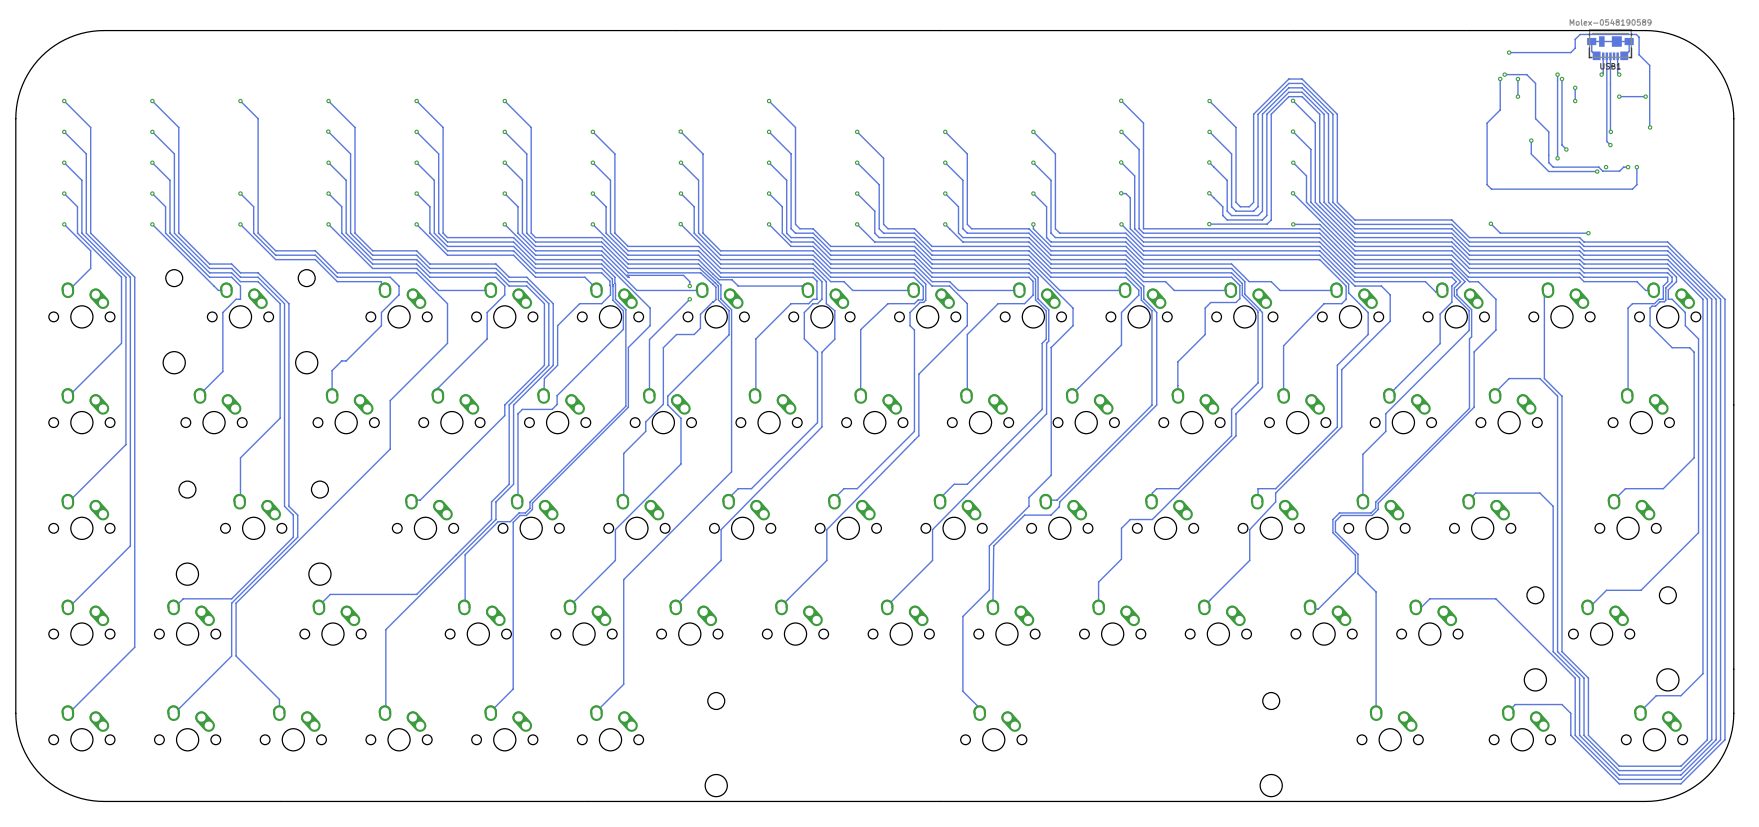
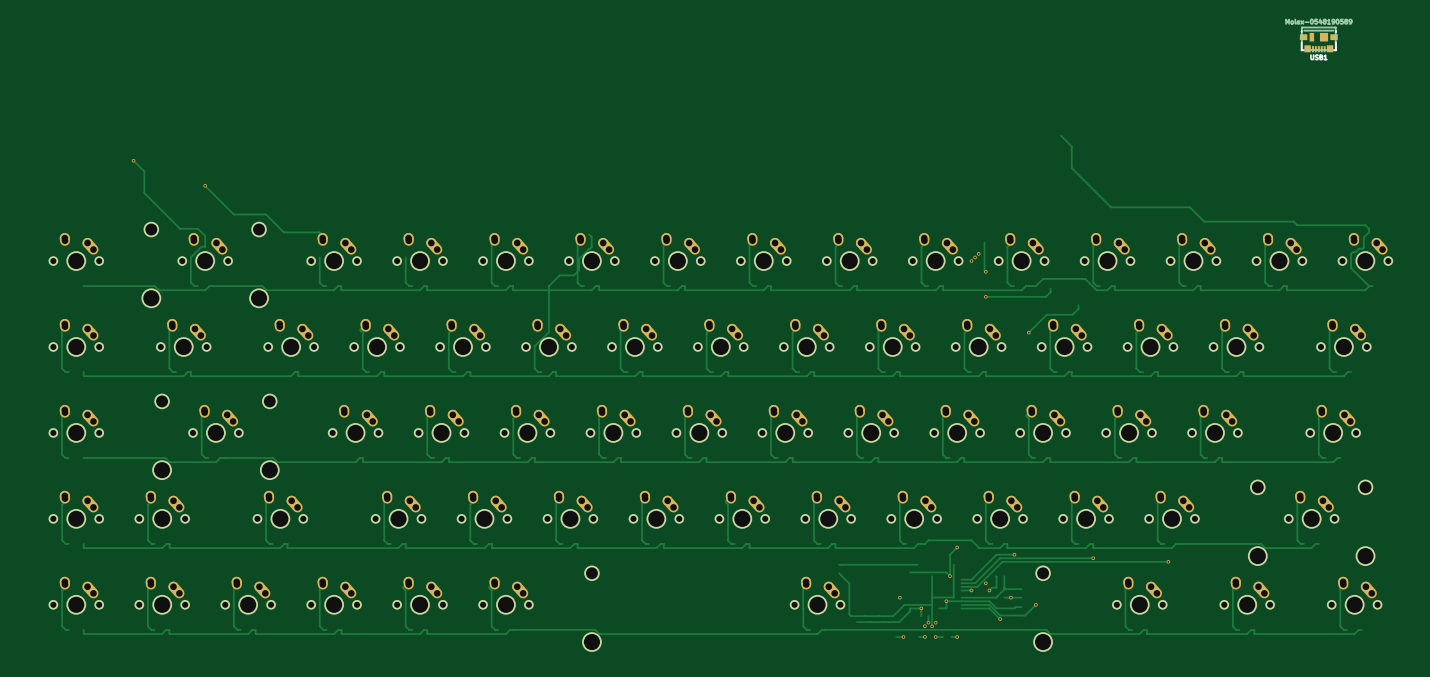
board edge: (1645, 30) (103, 30) (86, 32) (70, 37) (50, 48) (30, 69) (20, 90) (16, 112) (15, 713) (17, 730) (22, 747) (37, 771) (54, 786) (75, 796) (103, 801) (1645, 801) (1662, 799) (1679, 794) (1699, 783) (1718, 762) (1729, 741) (1733, 719) (1733, 112) (1730, 95) (1724, 79) (1707, 56) (1694, 45) (1679, 37) (1662, 32) (1645, 30) -> none
track: (1509, 52) (1570, 52) (1575, 48) (1575, 39) (1580, 34) (1636, 34) (1639, 37) (1639, 54) (1649, 65) (1650, 127) -> none
via: (1509, 52) -> none
track: (1624, 55) (1629, 51) (1629, 41) (1591, 41) (1591, 51) (1596, 55) -> none
track: (1603, 56) (1601, 74) -> none
track: (1606, 56) (1606, 141) (1610, 145) -> none
track: (1610, 56) (1610, 131) -> none
track: (1617, 56) (1619, 74) -> none
track: (1504, 74) (1526, 74) (1535, 83) (1535, 118) (1548, 131) (1548, 162) (1553, 167) (1598, 167) (1602, 171) (1619, 171) (1623, 167) (1628, 167) -> none
via: (1504, 74) -> none
track: (1557, 74) (1557, 158) -> none
via: (1557, 74) -> none
via: (1601, 74) -> none
via: (1619, 74) -> none
track: (1500, 78) (1500, 109) (1487, 123) (1487, 184) (1491, 189) (1632, 189) (1636, 184) (1636, 167) -> none
via: (1500, 78) -> none
track: (1517, 79) (1517, 96) -> none
via: (1517, 79) -> none
track: (1561, 79) (1561, 145) (1566, 149) -> none
via: (1561, 79) -> none
track: (1575, 87) (1575, 101) -> none
via: (1575, 87) -> none
via: (1517, 96) -> none
via: (1619, 96) -> none
track: (1645, 96) (1619, 96) -> none
via: (1645, 96) -> none
track: (1121, 100) (1143, 123) (1143, 228) (1319, 228) (1354, 264) (1451, 264) (1469, 281) (1478, 281) (1495, 299) (1495, 330) (1474, 351) (1474, 407) (1378, 503) (1378, 509) (1372, 515) (1341, 515) (1335, 521) (1335, 531) (1357, 554) (1357, 573) (1376, 591) (1376, 714) -> (1132, 629) (1125, 626) (1125, 587) (1128, 584)
via: (1121, 100) -> none
track: (1293, 100) (1315, 123) (1315, 202) (1354, 242) (1451, 242) (1469, 259) (1579, 259) (1584, 264) (1667, 264) (1702, 299) (1702, 673) (1680, 695) (1656, 695) (1640, 711) (1640, 714) -> none
via: (1293, 100) -> none
track: (64, 101) (90, 127) (90, 233) (134, 277) (134, 647) (68, 714) -> (68, 629) (62, 626) (62, 590) (65, 584)
via: (64, 101) -> none
track: (152, 101) (178, 127) (178, 233) (209, 264) (231, 264) (240, 272) (258, 272) (288, 303) (288, 506) (297, 515) (297, 537) (231, 603) (231, 656) (173, 714) -> (154, 629) (147, 626) (147, 587) (150, 584)
via: (152, 101) -> none
track: (240, 101) (258, 118) (258, 233) (275, 250) (315, 250) (337, 272) (416, 272) (447, 303) (447, 343) (390, 400) (390, 449) (236, 603) (236, 656) (279, 699) (279, 714) -> (240, 629) (237, 629) (233, 626) (233, 587) (236, 584)
via: (240, 101) -> none
track: (328, 101) (355, 127) (355, 233) (372, 250) (416, 250) (429, 264) (495, 264) (509, 277) (526, 277) (553, 303) (553, 365) (513, 404) (513, 484) (495, 501) (495, 519) (385, 629) (385, 714) -> (326, 629) (323, 629) (319, 626) (319, 587) (322, 584)
via: (328, 101) -> none
track: (416, 101) (443, 127) (443, 233) (447, 237) (513, 237) (535, 259) (601, 259) (650, 308) (650, 325) (628, 347) (628, 407) (532, 503) (532, 509) (526, 515) (520, 515) (513, 522) (513, 689) (490, 711) -> (412, 629) (405, 626) (405, 590) (403, 586) (408, 581)
via: (416, 101) -> none
track: (504, 101) (531, 127) (531, 233) (535, 237) (601, 237) (628, 264) (698, 264) (717, 281) -> none
via: (504, 101) -> none
track: (769, 101) (795, 127) (795, 224) (799, 228) (813, 228) (830, 246) (914, 246) (932, 264) (1028, 264) (1073, 308) (1073, 325) (1051, 347) (1051, 475) (1028, 497) (1028, 506) (989, 545) (989, 590) (962, 616) (962, 691) (979, 708) (979, 714) -> (810, 629) (803, 626) (803, 587) (806, 584)
via: (769, 101) -> none
track: (1209, 101) (1236, 127) (1236, 202) (1240, 206) (1249, 206) (1253, 202) (1253, 114) (1288, 79) (1302, 79) (1337, 114) (1337, 202) (1354, 219) (1451, 219) (1469, 237) (1579, 237) (1584, 242) (1667, 242) (1724, 299) (1724, 739) (1680, 783) (1619, 783) (1570, 735) (1570, 713) (1561, 704) (1515, 704) (1508, 711) -> none
via: (1209, 101) -> none
via: (1575, 101) -> none
via: (1650, 127) -> none
track: (64, 131) (86, 153) (86, 233) (130, 277) (130, 545) (68, 609) -> (68, 543) (62, 540) (62, 504) (65, 498)
via: (64, 131) -> none
track: (152, 131) (174, 153) (174, 233) (209, 268) (231, 268) (240, 277) (258, 277) (284, 303) (284, 506) (293, 515) (293, 537) (231, 598) (183, 598) (176, 605) (173, 605) -> none
via: (152, 131) -> none
track: (328, 131) (350, 153) (350, 233) (372, 255) (416, 255) (429, 268) (495, 268) (509, 281) (526, 281) (548, 303) (548, 365) (509, 404) (509, 484) (491, 501) (491, 519) (416, 594) (330, 594) (318, 605) -> none
via: (328, 131) -> none
track: (416, 131) (438, 153) (438, 233) (447, 242) (513, 242) (535, 264) (601, 264) (614, 277) (615, 299) (625, 309) (625, 406) (529, 502) (529, 508) (525, 512) (519, 512) (510, 521) (498, 521) (465, 554) (464, 605) -> none
via: (416, 131) -> none
track: (504, 131) (526, 153) (526, 233) (535, 242) (601, 242) (628, 268) (699, 268) (715, 282) -> none
via: (504, 131) -> none
track: (592, 131) (614, 153) (614, 233) (628, 246) (698, 246) (720, 268) (813, 268) (826, 281) (826, 303) (834, 310) (834, 339) (821, 352) (821, 427) (721, 529) (721, 560) (675, 605) -> none
via: (592, 131) -> none
track: (680, 131) (703, 153) (703, 233) (720, 250) (813, 250) (830, 268) (914, 268) (932, 286) (949, 286) (967, 303) (967, 325) (918, 374) (918, 435) (826, 529) (826, 560) (781, 605) -> none
via: (680, 131) -> none
track: (769, 131) (791, 153) (791, 228) (795, 233) (813, 233) (830, 250) (914, 250) (932, 268) (1028, 268) (1038, 277) (1038, 299) (1048, 309) (1046, 413) (932, 529) (932, 560) (887, 605) -> (734, 543) (727, 540) (727, 504) (725, 501) (730, 495)
via: (769, 131) -> none
track: (857, 131) (883, 158) (883, 224) (888, 228) (914, 228) (932, 246) (1028, 246) (1051, 268) (1125, 268) (1143, 286) (1143, 299) (1156, 312) (1156, 404) (1059, 501) (1059, 506) (1051, 515) (1024, 515) (993, 545) (993, 609) -> (820, 543) (813, 540) (813, 501) (816, 498)
via: (857, 131) -> none
track: (945, 131) (967, 153) (967, 224) (971, 228) (1028, 228) (1051, 250) (1125, 250) (1143, 268) (1231, 268) (1244, 281) (1244, 294) (1262, 312) (1262, 387) (1236, 413) (1236, 435) (1152, 519) (1130, 519) (1121, 528) (1121, 559) (1098, 582) (1098, 605) -> none
via: (945, 131) -> none
track: (1033, 131) (1055, 153) (1055, 228) (1059, 233) (1125, 233) (1143, 250) (1319, 250) (1354, 286) (1381, 286) (1390, 294) (1390, 321) (1341, 369) (1341, 427) (1275, 493) (1275, 501) (1249, 529) (1249, 560) (1204, 605) -> none
via: (1033, 131) -> none
track: (1121, 131) (1139, 149) (1139, 228) (1143, 233) (1319, 233) (1354, 268) (1451, 268) (1465, 281) (1456, 289) (1456, 294) (1471, 309) (1471, 336) (1469, 338) (1469, 408) (1375, 502) (1375, 508) (1371, 512) (1339, 512) (1332, 519) (1332, 532) (1355, 555) (1355, 571) (1318, 609) (1310, 609) -> (1078, 543) (1071, 540) (1071, 501) (1074, 498)
via: (1121, 131) -> none
track: (1209, 131) (1231, 153) (1231, 206) (1236, 211) (1253, 211) (1258, 206) (1258, 114) (1288, 83) (1302, 83) (1332, 114) (1332, 202) (1354, 224) (1451, 224) (1469, 242) (1579, 242) (1584, 246) (1667, 246) (1720, 299) (1720, 739) (1680, 779) (1619, 779) (1575, 735) (1575, 678) (1495, 598) (1429, 598) (1421, 607) (1415, 605) -> none
via: (1209, 131) -> none
track: (1293, 131) (1310, 149) (1310, 202) (1354, 246) (1451, 246) (1469, 264) (1579, 264) (1584, 268) (1667, 268) (1676, 277) (1676, 281) (1668, 289) (1668, 299) (1672, 299) (1685, 312) (1685, 325) (1698, 338) (1698, 532) (1640, 590) (1606, 590) (1587, 609) -> (1303, 543) (1297, 540) (1297, 501) (1300, 498)
via: (1293, 131) -> none
via: (1610, 131) -> none
track: (1531, 140) (1531, 154) (1548, 171) (1597, 171) -> none
via: (1531, 140) -> none
via: (1610, 145) -> none
via: (1566, 149) -> none
via: (1557, 158) -> none
track: (64, 162) (81, 180) (81, 233) (125, 277) (125, 444) (68, 503) -> (68, 457) (61, 454) (61, 415) (65, 412)
via: (64, 162) -> none
track: (152, 162) (169, 180) (169, 233) (209, 272) (231, 272) (240, 281) (258, 281) (280, 303) (280, 418) (240, 457) (239, 503) -> (208, 457) (201, 454) (201, 415) (204, 412)
via: (152, 162) -> none
track: (328, 162) (346, 180) (346, 233) (372, 259) (416, 259) (429, 272) (495, 272) (509, 286) (526, 286) (544, 303) (544, 365) (504, 404) (504, 415) (420, 500) (411, 500) -> none
via: (328, 162) -> none
track: (416, 162) (434, 180) (434, 233) (447, 246) (513, 246) (535, 268) (601, 268) (612, 279) (612, 300) (623, 310) (623, 329) (557, 395) (557, 404) (552, 409) (522, 409) (517, 413) (517, 503) -> none
via: (416, 162) -> none
track: (504, 162) (522, 180) (522, 233) (535, 246) (601, 246) (628, 272) (700, 272) (712, 284) -> none
via: (504, 162) -> none
track: (592, 162) (610, 180) (610, 233) (628, 250) (698, 250) (720, 272) (813, 272) (821, 281) (821, 299) (817, 303) (813, 303) (804, 312) -> none
via: (592, 162) -> none
track: (680, 162) (698, 180) (698, 233) (720, 255) (813, 255) (830, 272) (914, 272) (925, 284) (925, 300) (920, 302) (910, 312) -> (752, 240) (749, 243) (749, 257)
via: (680, 162) -> none
track: (769, 162) (786, 180) (786, 233) (791, 237) (813, 237) (830, 255) (914, 255) (932, 272) (1028, 272) (1035, 279) (1035, 300) (1046, 310) (1046, 339) (1042, 343) (1042, 409) (967, 484) (954, 484) (940, 498) (940, 503) -> (777, 457) (774, 457) (770, 454) (770, 415) (774, 412)
via: (769, 162) -> none
track: (857, 162) (879, 184) (879, 228) (883, 233) (914, 233) (932, 250) (1028, 250) (1051, 272) (1125, 272) (1141, 288) (1141, 300) (1151, 310) (1151, 405) (1057, 500) (1045, 500) -> none
via: (857, 162) -> none
track: (945, 162) (962, 180) (962, 228) (967, 233) (1028, 233) (1051, 255) (1125, 255) (1143, 272) (1231, 272) (1242, 283) (1242, 295) (1258, 312) (1258, 382) (1231, 409) (1231, 435) (1178, 488) (1156, 488) (1152, 493) (1151, 503) -> (949, 457) (942, 454) (942, 415) (945, 412)
via: (945, 162) -> none
track: (1033, 162) (1051, 180) (1051, 233) (1055, 237) (1125, 237) (1143, 255) (1319, 255) (1348, 284) (1348, 292) (1368, 312) (1368, 334) (1337, 365) (1337, 427) (1275, 488) (1258, 488) (1257, 503) -> none
via: (1033, 162) -> none
track: (1121, 162) (1134, 175) (1134, 228) (1143, 237) (1319, 237) (1354, 272) (1451, 272) (1460, 281) (1454, 287) (1454, 295) (1469, 310) (1469, 330) (1385, 413) (1385, 431) (1362, 454) (1363, 503) -> (1121, 457) (1114, 454) (1114, 418) (1117, 412)
via: (1121, 162) -> none
track: (1209, 162) (1227, 180) (1227, 211) (1231, 215) (1258, 215) (1262, 211) (1262, 114) (1288, 87) (1302, 87) (1328, 114) (1328, 202) (1354, 228) (1451, 228) (1469, 246) (1579, 246) (1584, 250) (1667, 250) (1716, 299) (1716, 739) (1680, 775) (1619, 775) (1579, 735) (1579, 678) (1553, 651) (1553, 506) (1539, 493) (1475, 493) (1468, 500) -> none
via: (1209, 162) -> none
via: (1293, 162) -> none
via: (1606, 167) -> none
via: (1628, 167) -> none
via: (1636, 167) -> none
via: (1597, 171) -> none
track: (64, 193) (77, 206) (77, 233) (121, 277) (121, 343) (70, 394) (67, 394) -> none
via: (64, 193) -> none
track: (240, 193) (253, 206) (253, 233) (275, 255) (315, 255) (337, 277) (390, 277) (399, 286) (399, 294) (381, 312) -> none
via: (240, 193) -> none
track: (328, 193) (341, 206) (341, 233) (372, 264) (416, 264) (429, 277) (495, 277) (504, 286) (504, 294) (487, 312) -> none
via: (328, 193) -> none
track: (416, 193) (429, 206) (429, 233) (447, 250) (513, 250) (535, 272) (601, 272) (609, 281) (610, 294) (601, 303) (579, 303) (557, 325) (557, 365) (544, 378) (543, 397) -> (455, 372) (448, 368) (448, 332) (451, 326)
via: (416, 193) -> none
track: (504, 193) (517, 206) (517, 233) (535, 250) (601, 250) (628, 277) (627, 275) (683, 275) (689, 281) (689, 286) -> none
via: (504, 193) -> none
track: (592, 193) (606, 206) (606, 233) (628, 255) (698, 255) (720, 277) (813, 277) (816, 281) (816, 299) (813, 299) (808, 303) (791, 303) (755, 338) (755, 397) -> (627, 372) (624, 372) (620, 368) (620, 329) (623, 326)
via: (592, 193) -> none
track: (680, 193) (694, 206) (694, 233) (720, 259) (813, 259) (830, 277) (914, 277) (923, 286) (922, 299) (918, 299) (914, 303) (888, 303) (860, 329) (860, 394) -> none
via: (680, 193) -> none
track: (769, 193) (782, 206) (782, 233) (791, 242) (813, 242) (830, 259) (914, 259) (932, 277) (1028, 277) (1033, 281) (1033, 295) (1024, 303) (998, 303) (967, 334) (966, 394) -> none
via: (769, 193) -> none
track: (857, 193) (874, 211) (874, 233) (879, 237) (914, 237) (932, 255) (1028, 255) (1051, 277) (1125, 277) (1138, 290) (1138, 295) (1121, 312) (1121, 345) (1072, 394) -> none
via: (857, 193) -> none
track: (945, 193) (958, 206) (958, 233) (962, 237) (1028, 237) (1051, 259) (1125, 259) (1143, 277) (1231, 277) (1239, 285) (1239, 298) (1236, 302) (1210, 302) (1205, 308) (1205, 334) (1177, 361) (1177, 394) -> none
via: (945, 193) -> none
track: (1033, 193) (1046, 206) (1046, 237) (1051, 242) (1125, 242) (1143, 259) (1319, 259) (1346, 286) -> none
via: (1033, 193) -> none
track: (1121, 193) (1125, 193) (1130, 197) (1130, 228) (1143, 242) (1319, 242) (1354, 277) (1451, 277) (1456, 281) (1451, 286) (1451, 302) (1440, 313) (1440, 343) (1389, 394) -> none
via: (1121, 193) -> none
track: (1209, 193) (1222, 206) (1222, 215) (1227, 219) (1262, 219) (1266, 215) (1266, 114) (1288, 92) (1302, 92) (1324, 114) (1324, 202) (1354, 233) (1451, 233) (1469, 250) (1579, 250) (1584, 255) (1667, 255) (1711, 299) (1711, 739) (1680, 770) (1663, 770) -> none
via: (1209, 193) -> none
track: (1293, 193) (1354, 255) (1451, 255) (1469, 272) (1579, 272) (1584, 277) (1667, 277) (1667, 281) (1663, 286) (1663, 299) (1658, 299) (1654, 303) (1632, 303) (1628, 308) (1627, 397) -> (1336, 372) (1329, 368) (1329, 329) (1332, 326)
via: (1293, 193) -> none
track: (1490, 223) (1500, 233) (1588, 233) -> none
via: (1490, 223) -> none
track: (64, 224) (90, 250) (90, 268) (68, 291) -> none
via: (64, 224) -> none
track: (152, 224) (218, 290) (226, 288) -> none
via: (152, 224) -> none
track: (328, 224) (372, 268) (416, 268) (438, 290) (488, 290) (490, 288) -> none
via: (328, 224) -> none
track: (416, 224) (447, 255) (513, 255) (535, 277) (584, 277) (596, 288) (596, 291) -> (498, 286) (491, 282) (491, 243) (494, 240)
via: (416, 224) -> none
track: (504, 224) (535, 255) (601, 255) (636, 290) (700, 290) (702, 288) -> none
via: (504, 224) -> none
track: (592, 224) (628, 259) (698, 259) (719, 279) (731, 279) (738, 286) (802, 286) (808, 291) -> (663, 257) (663, 243) (666, 240)
via: (592, 224) -> none
track: (680, 224) (720, 264) (813, 264) (830, 281) (843, 281) (852, 290) (911, 290) (913, 288) -> none
via: (680, 224) -> none
track: (769, 224) (791, 246) (813, 246) (830, 264) (914, 264) (932, 281) (949, 281) (958, 290) (1019, 291) -> (842, 286) (835, 282) (835, 246) (838, 240)
via: (769, 224) -> none
track: (857, 224) (874, 242) (914, 242) (932, 259) (1028, 259) (1059, 290) (1123, 290) (1125, 288) -> none
via: (857, 224) -> none
track: (945, 224) (962, 242) (1028, 242) (1051, 264) (1125, 264) (1143, 281) (1165, 281) (1174, 290) (1228, 290) (1230, 288) -> none
via: (945, 224) -> none
track: (1033, 224) (1033, 228) (1051, 246) (1125, 246) (1143, 264) (1231, 264) (1249, 281) (1271, 281) (1280, 290) (1334, 290) (1336, 288) -> none
via: (1033, 224) -> none
track: (1121, 224) (1143, 246) (1319, 246) (1354, 281) (1425, 281) (1435, 291) (1442, 291) -> (1185, 286) (1179, 282) (1179, 243) (1182, 240)
via: (1121, 224) -> none
track: (1209, 224) (1267, 224) (1271, 219) (1271, 114) (1288, 96) (1302, 96) (1319, 114) (1319, 202) (1354, 237) (1451, 237) (1469, 255) (1579, 255) (1584, 259) (1667, 259) (1707, 299) (1707, 739) (1680, 766) (1619, 766) (1588, 735) (1588, 678) (1561, 651) (1561, 396) (1544, 378) (1544, 343) -> (1271, 286) (1268, 286) (1265, 282)
via: (1209, 224) -> none
track: (1293, 224) (1319, 224) (1354, 259) (1451, 259) (1468, 277) (1579, 277) (1584, 281) (1636, 281) (1645, 290) (1653, 288) -> none
via: (1293, 224) -> none
via: (1588, 233) -> none
track: (717, 282) (720, 285) (720, 299) (731, 309) (731, 471) (623, 579) (623, 684) (596, 711) -> (498, 629) (491, 626) (491, 590) (489, 586) (494, 581)
track: (715, 283) (718, 286) (718, 300) (729, 310) (729, 334) (667, 396) (667, 404) (680, 418) (680, 464) (615, 529) (615, 560) (569, 605) -> none
via: (689, 286) -> none
track: (1346, 286) (1346, 299) (1341, 303) (1324, 303) (1283, 345) (1283, 394) -> none
track: none -> (580, 240) (577, 243) (577, 282) (584, 286)
track: none -> (924, 240) (921, 246) (921, 282) (928, 286)
track: none -> (1010, 240) (1007, 246) (1007, 282) (1014, 286)
track: none -> (1096, 240) (1093, 243) (1093, 282) (1099, 286)
track: none -> (984, 242) (985, 271)
track: (689, 299) (649, 339) (649, 397) -> none
via: (689, 299) -> none
via: none -> (978, 253)
via: none -> (975, 257)
via: none -> (971, 261)
track: (381, 325) (346, 360) (341, 360) (332, 370) (332, 394) -> (319, 268) (319, 282) (326, 286)
track: (910, 325) (914, 330) (914, 431) (857, 488) (843, 488) (834, 500) -> (749, 268) (749, 282) (756, 286)
via: none -> (985, 271)
track: (487, 338) (438, 388) (438, 397) -> (405, 278) (405, 282) (412, 286)
track: (804, 338) (817, 352) (817, 422) (751, 488) (738, 488) (728, 500) -> (663, 278) (663, 282) (670, 286)
track: (222, 343) (222, 371) (199, 394) -> (190, 282) (194, 286) (197, 286)
track: none -> (83, 286) (154, 286) (158, 289)
track: none -> (1369, 286) (1365, 290) (1287, 290) (1286, 286) (1283, 286) (1279, 290) (1200, 290) (1200, 286) (1197, 286) (1193, 290) (1115, 290) (1114, 286) (1111, 286) (1107, 290) (1096, 290) (1085, 278) (1043, 278) (1035, 286) (1025, 286) (1021, 290) (943, 290) (943, 286) (939, 286) (935, 290) (857, 290) (857, 286) (854, 286) (849, 290) (771, 290) (770, 286) (767, 286) (763, 290) (685, 290) (685, 286) (681, 286) (677, 290) (599, 290) (599, 286) (595, 286) (591, 290) (513, 290) (513, 286) (509, 286) (505, 290) (427, 290) (427, 286) (424, 286) (419, 290) (341, 290) (341, 286) (338, 286) (333, 290) (266, 290) (262, 286) (209, 286) (205, 290) (158, 289)
track: (1676, 347) (1689, 347) (1694, 352) (1694, 457) (1663, 488) (1625, 488) (1613, 500) -> none
track: none -> (1050, 288) (1050, 292) (1045, 296) (985, 296)
via: none -> (985, 296)
track: none -> (1078, 305) (1078, 308) (1072, 314) (1046, 314) (1028, 332)
track: none -> (365, 324) (360, 329) (362, 332) (362, 368) (369, 372)
track: (1495, 394) (1509, 378) (1539, 378) (1557, 396) (1557, 651) (1584, 678) (1584, 735) (1619, 770) (1641, 770) -> (1343, 584) (1340, 587) (1340, 626) (1343, 629)
track: none -> (65, 326) (61, 329) (61, 368) (65, 372) (68, 372)
track: none -> (172, 326) (169, 329) (169, 368) (175, 372)
track: none -> (709, 326) (706, 332) (706, 368) (713, 372)
track: none -> (795, 326) (792, 332) (792, 368) (799, 372)
track: none -> (881, 326) (878, 329) (878, 368) (884, 372)
track: none -> (967, 326) (964, 332) (964, 368) (971, 372)
track: none -> (1053, 326) (1050, 329) (1050, 368) (1056, 372)
track: none -> (1139, 326) (1136, 332) (1136, 368) (1143, 372)
track: none -> (1225, 326) (1222, 329) (1222, 368) (1228, 372)
via: none -> (1028, 332)
track: (645, 431) (623, 453) (623, 503) -> (534, 354) (534, 368) (541, 372)
track: none -> (1351, 372) (1347, 372) (1343, 376) (1243, 376) (1243, 372) (1240, 372) (1236, 376) (1158, 376) (1157, 372) (1154, 372) (1150, 376) (1072, 376) (1071, 372) (1068, 372) (1064, 376) (986, 376) (986, 372) (982, 372) (978, 376) (900, 376) (899, 372) (896, 372) (892, 376) (814, 376) (814, 372) (811, 372) (806, 376) (728, 376) (728, 372) (725, 372) (720, 376) (642, 376) (642, 372) (639, 372) (635, 376) (556, 376) (556, 372) (552, 372) (548, 376) (470, 376) (470, 372) (467, 372) (463, 376) (384, 376) (384, 372) (381, 372) (376, 376) (298, 376) (298, 372) (295, 372) (290, 376) (191, 376) (190, 372) (187, 372) (183, 376) (84, 376) (83, 372)
track: none -> (1031, 410) (1026, 415) (1028, 418) (1028, 454) (1035, 457)
track: none -> (430, 412) (427, 415) (427, 454) (430, 457) (434, 457)
track: none -> (516, 412) (513, 418) (513, 454) (520, 457)
track: none -> (602, 412) (599, 415) (599, 454) (602, 457) (605, 457)
track: none -> (688, 412) (685, 415) (685, 454) (691, 457)
track: none -> (859, 412) (856, 415) (856, 454) (863, 457)
track: none -> (1203, 412) (1200, 415) (1200, 454) (1207, 457)
track: none -> (1321, 412) (1318, 415) (1318, 454) (1322, 457) (1325, 457)
track: none -> (1340, 457) (1337, 457) (1333, 462) (1222, 462) (1222, 457) (1218, 457) (1214, 462) (1136, 462) (1136, 457) (1133, 457) (1129, 462) (1050, 462) (1050, 457) (1047, 457) (1042, 462) (964, 462) (964, 457) (961, 457) (956, 462) (878, 462) (878, 457) (875, 457) (871, 462) (793, 462) (792, 457) (789, 457) (785, 462) (706, 462) (706, 457) (703, 457) (699, 462) (621, 462) (620, 457) (617, 457) (613, 462) (535, 462) (534, 457) (531, 457) (527, 462) (449, 462) (448, 457) (445, 457) (441, 462) (363, 462) (363, 457) (359, 457) (355, 462) (277, 462) (273, 457) (220, 457) (216, 462) (169, 462) (165, 457) (83, 457)
track: none -> (150, 498) (148, 504) (148, 540) (154, 543)
track: none -> (269, 498) (266, 501) (266, 540) (272, 543)
track: none -> (387, 498) (384, 501) (384, 540) (390, 543)
track: none -> (473, 498) (470, 504) (470, 540) (477, 543)
track: none -> (559, 498) (556, 501) (556, 540) (562, 543)
track: none -> (645, 498) (642, 501) (642, 540) (645, 543) (648, 543)
track: none -> (902, 498) (899, 501) (899, 540) (906, 543)
track: none -> (988, 498) (985, 501) (985, 540) (992, 543)
track: none -> (1160, 498) (1157, 501) (1157, 540) (1164, 543)
track: none -> (1318, 543) (1315, 543) (1311, 548) (1265, 548) (1261, 543) (1176, 543) (1171, 548) (1093, 548) (1093, 543) (1090, 543) (1085, 548) (1007, 548) (1007, 543) (1004, 543) (999, 548) (979, 548) (971, 540) (928, 540) (924, 543) (918, 543) (914, 548) (835, 548) (835, 543) (832, 543) (828, 548) (749, 548) (749, 543) (746, 543) (742, 548) (664, 548) (663, 543) (660, 543) (656, 548) (577, 548) (577, 543) (574, 543) (570, 548) (492, 548) (491, 543) (488, 543) (484, 548) (406, 548) (405, 543) (402, 543) (398, 548) (287, 548) (287, 543) (284, 543) (280, 548) (170, 548) (169, 543) (166, 543) (162, 548) (84, 548) (83, 543)
track: none -> (957, 547) (950, 554) (950, 576) (946, 572) (909, 572)
via: none -> (957, 547)
track: none -> (1014, 554) (996, 554) (971, 579) (961, 579)
via: none -> (1014, 554)
track: none -> (1093, 558) (1000, 558) (975, 583) (961, 583)
via: none -> (1093, 558)
track: none -> (1168, 561) (1002, 561) (977, 586) (961, 586)
via: none -> (1168, 561)
track: none -> (917, 564) (838, 564)
track: none -> (953, 564) (953, 597) (932, 597)
track: none -> (838, 573) (849, 583) (850, 616) (893, 616) (904, 604) (932, 604)
track: none -> (932, 576) (932, 626)
via: none -> (950, 576)
track: none -> (995, 576) (996, 587) (992, 587) (989, 590)
track: none -> (1004, 576) (1004, 587)
via: none -> (985, 583)
track: none -> (1235, 584) (1232, 587) (1232, 626) (1239, 629)
track: none -> (1004, 587) (1021, 589)
track: none -> (1004, 587) (996, 597) (961, 597)
track: none -> (971, 590) (961, 590)
via: none -> (971, 590)
via: none -> (989, 590)
via: none -> (1010, 597)
track: none -> (1021, 597) (1004, 597)
via: none -> (899, 597)
via: none -> (946, 601)
track: none -> (1035, 604) (1025, 615) (1000, 615) (989, 604) (961, 604)
via: none -> (1035, 604)
track: none -> (1021, 607) (996, 608) (989, 601) (946, 601) (946, 608) (939, 608)
via: none -> (921, 608)
track: none -> (961, 608) (989, 608) (1000, 619)
track: none -> (921, 616) (921, 608) (909, 608) (909, 611) (899, 622) (856, 622)
track: none -> (928, 616) (928, 622)
via: none -> (1000, 619)
via: none -> (928, 622)
via: none -> (935, 622)
via: none -> (924, 626)
via: none -> (932, 626)
track: (1659, 770) (1644, 770) -> (1358, 629) (1354, 634) (1254, 634) (1254, 629) (1251, 629) (1247, 634) (1147, 634) (1146, 629) (1143, 629) (1139, 634) (1050, 634) (1046, 629) (821, 629) (817, 634) (599, 634) (595, 629) (509, 629) (505, 634) (427, 634) (427, 629) (424, 629) (419, 634) (341, 634) (341, 629) (338, 629) (334, 634) (255, 634) (255, 629) (252, 629) (248, 634) (169, 634) (169, 629) (166, 629) (162, 634) (84, 634) (83, 629)
track: none -> (903, 637) (896, 637)
via: none -> (903, 637)
track: none -> (924, 636) (919, 637)
via: none -> (924, 636)
via: none -> (935, 637)
track: none -> (942, 637) (935, 637)
track: none -> (957, 637) (951, 637)
via: none -> (957, 637)

